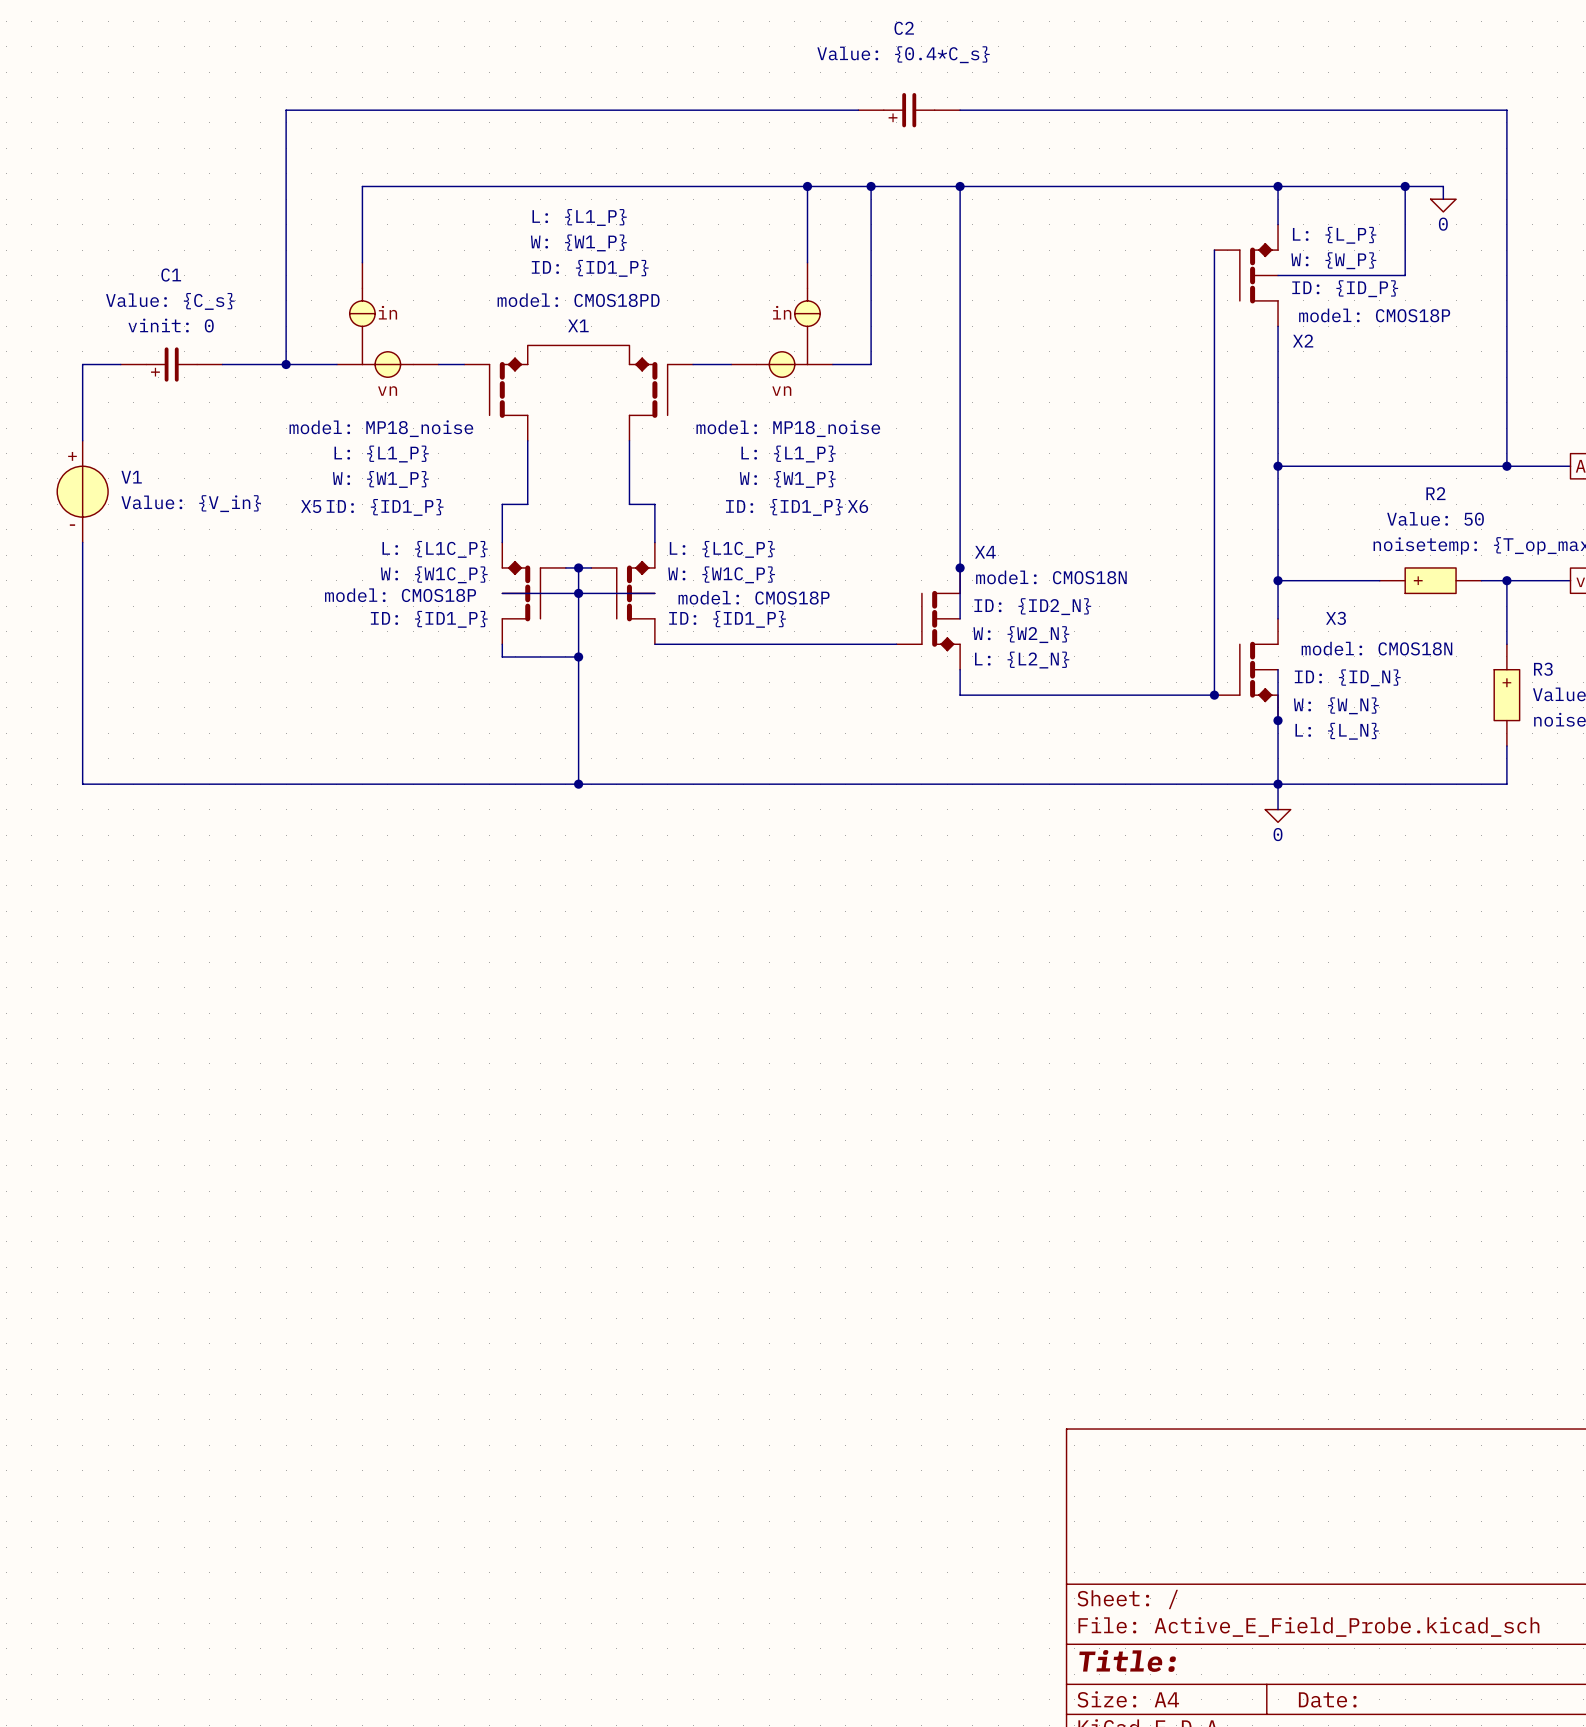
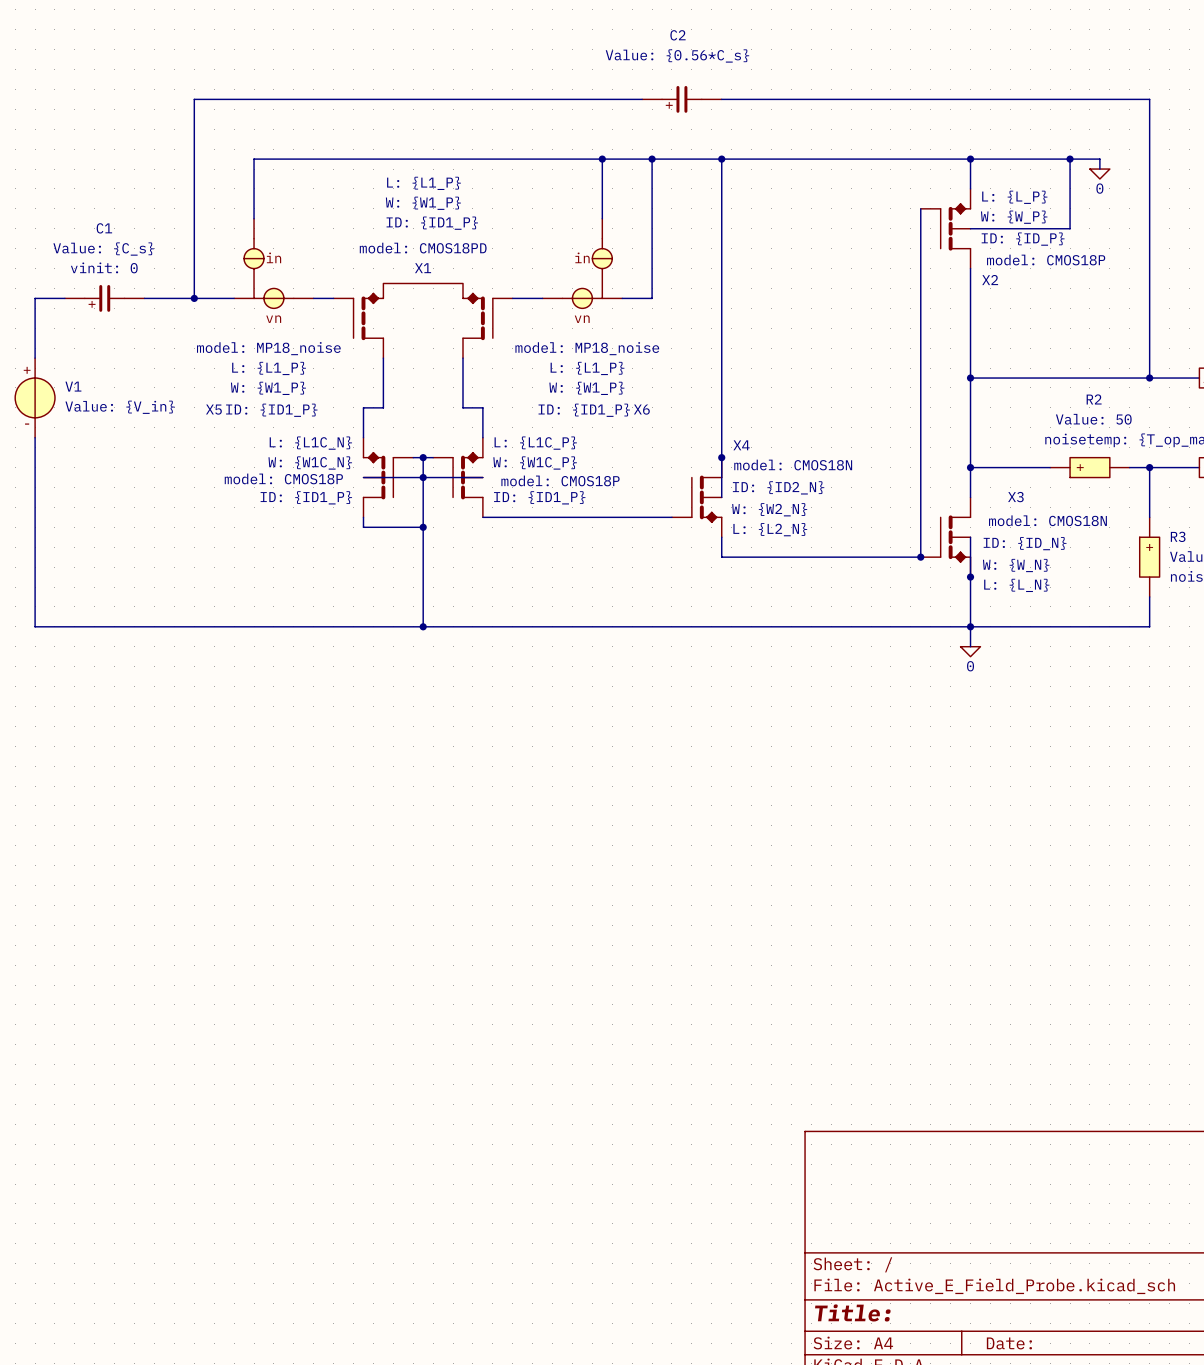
C2 value: Value: {0.4*C_s} (903, 54) -> Value: {0.56*C_s} (677, 55)
part text: L: {L1C_P} (435, 549) -> L: {L1C_N} (310, 443)
part text: W: {W1C_P} (434, 574) -> W: {W1C_N} (310, 463)

